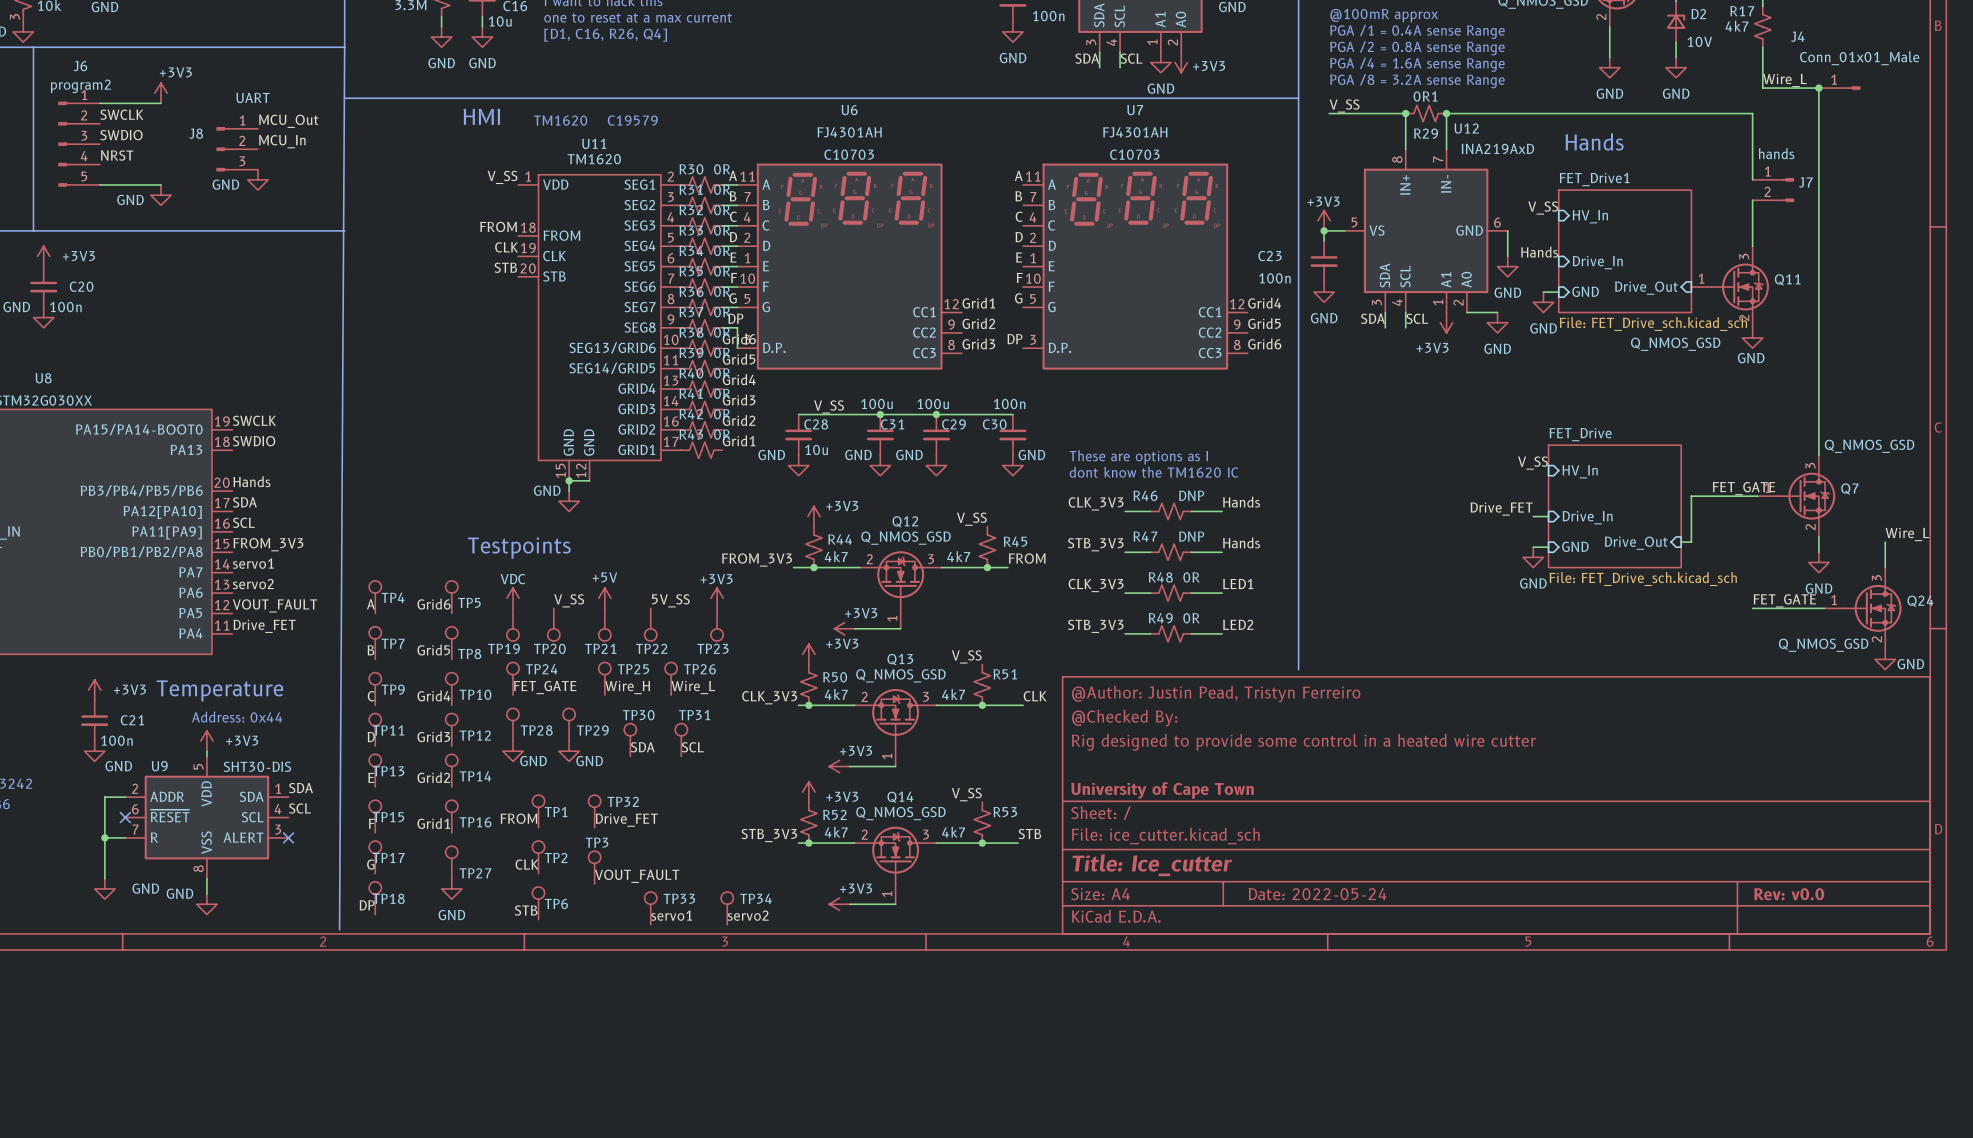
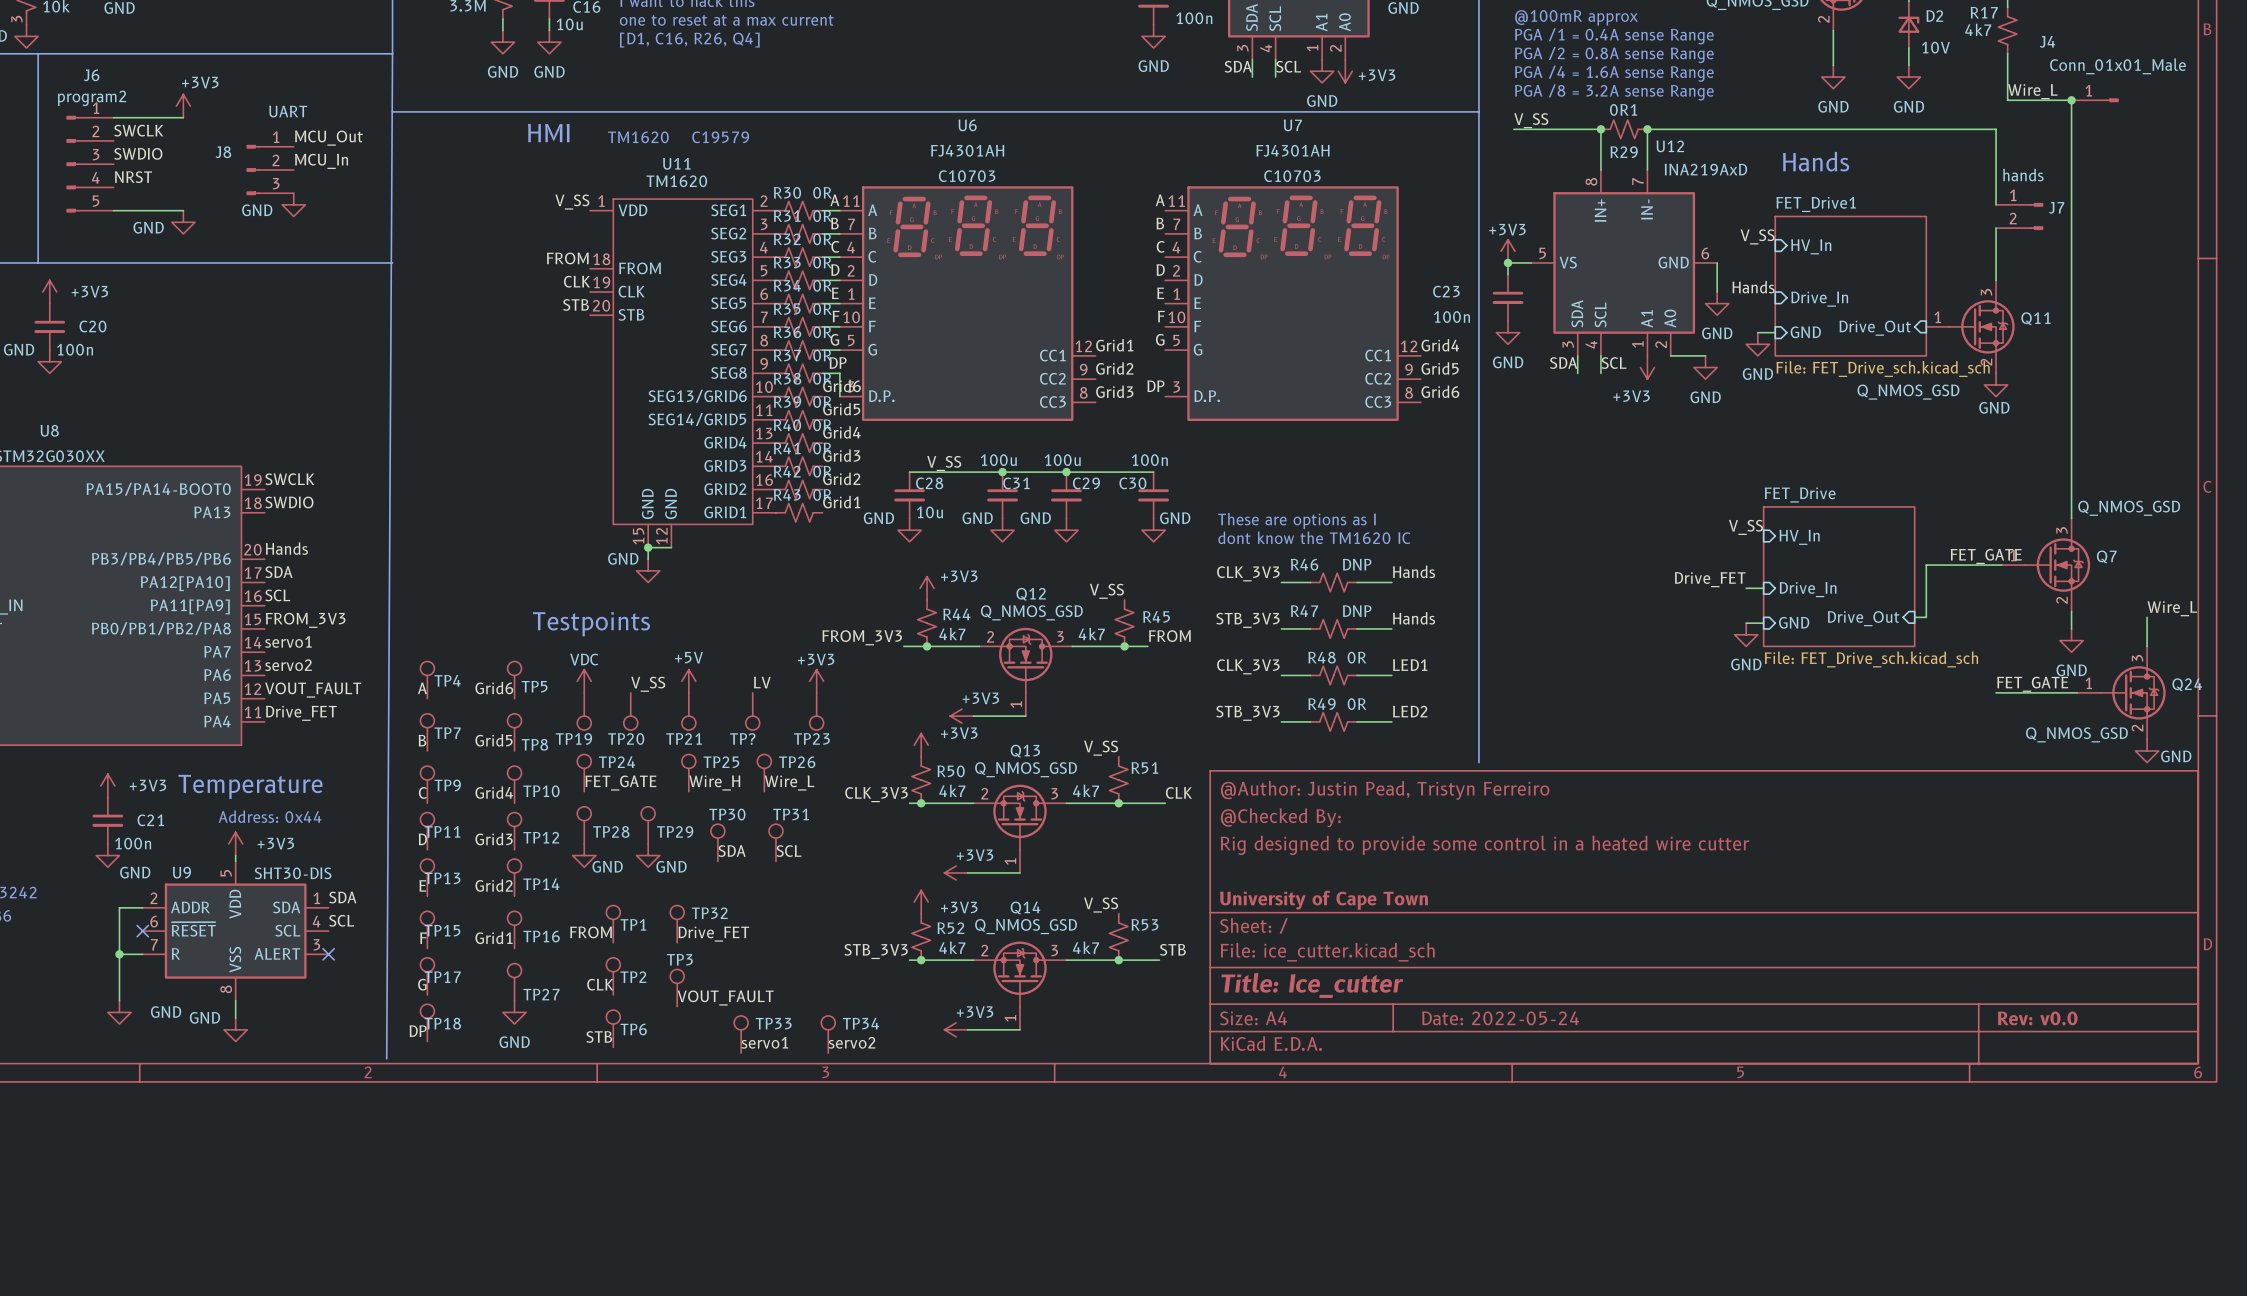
label: none -> LV (762, 682)
label: 5V_SS (670, 600) -> none
TP22: (650, 624) -> none
TP?: none -> (752, 711)

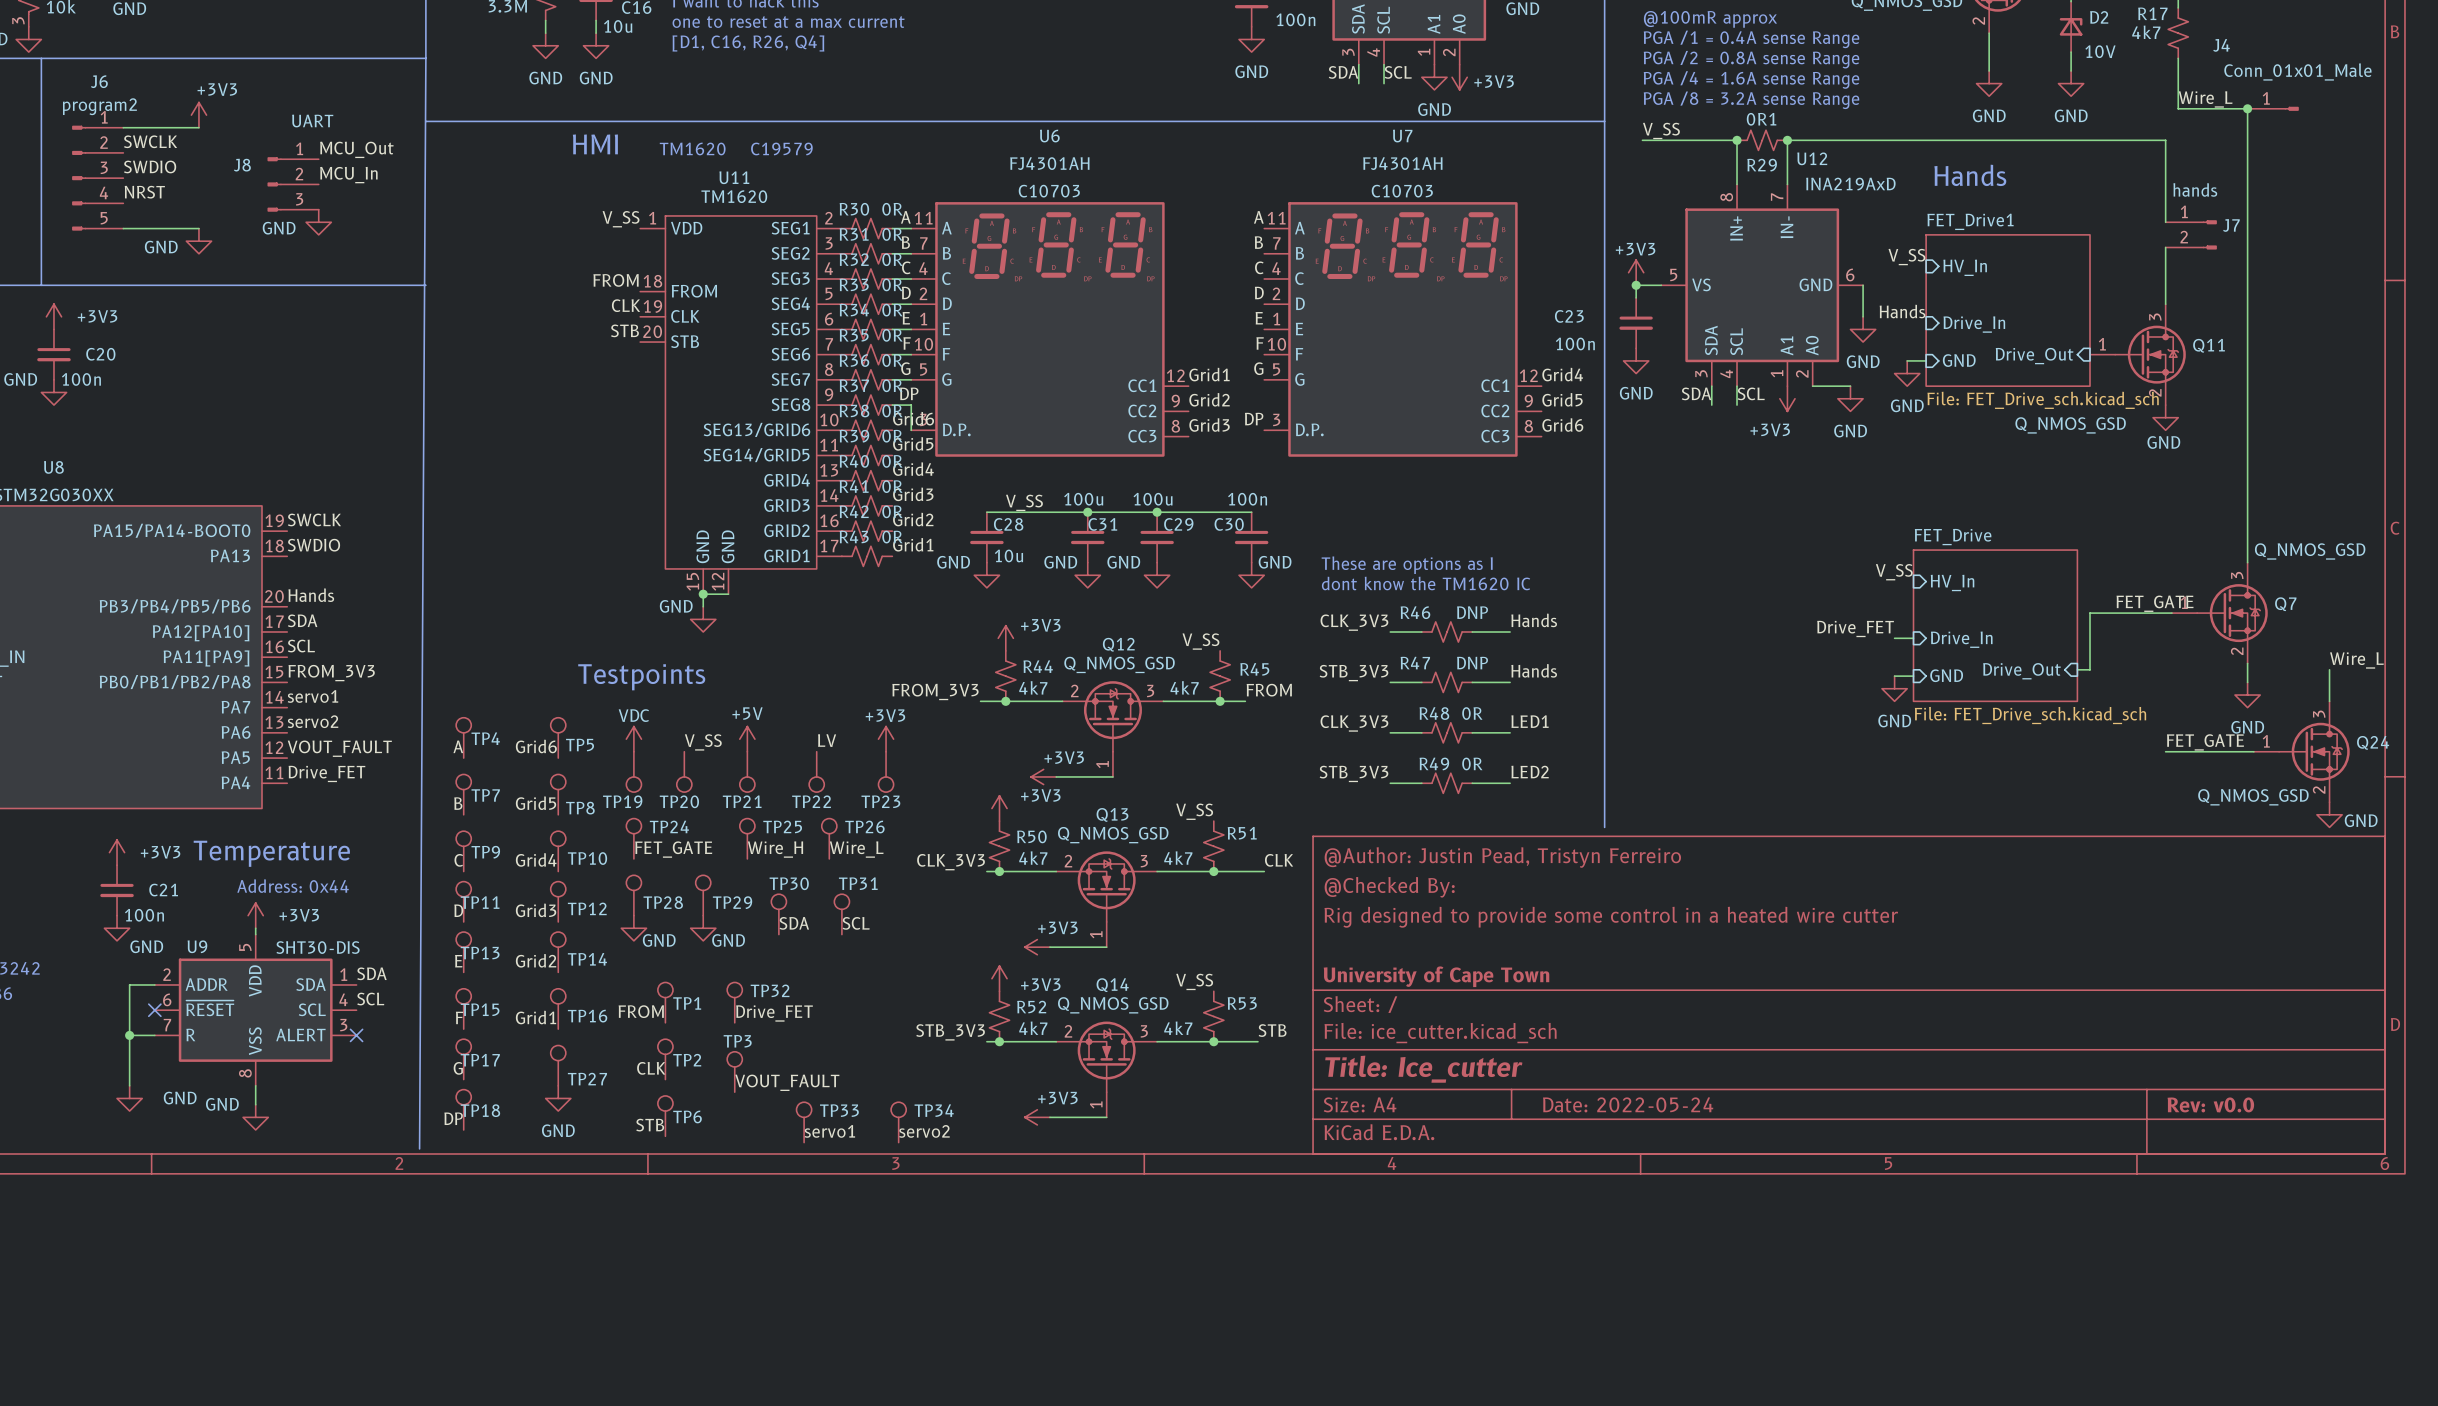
TP? name: TP? (742, 738) -> TP22 (811, 801)

